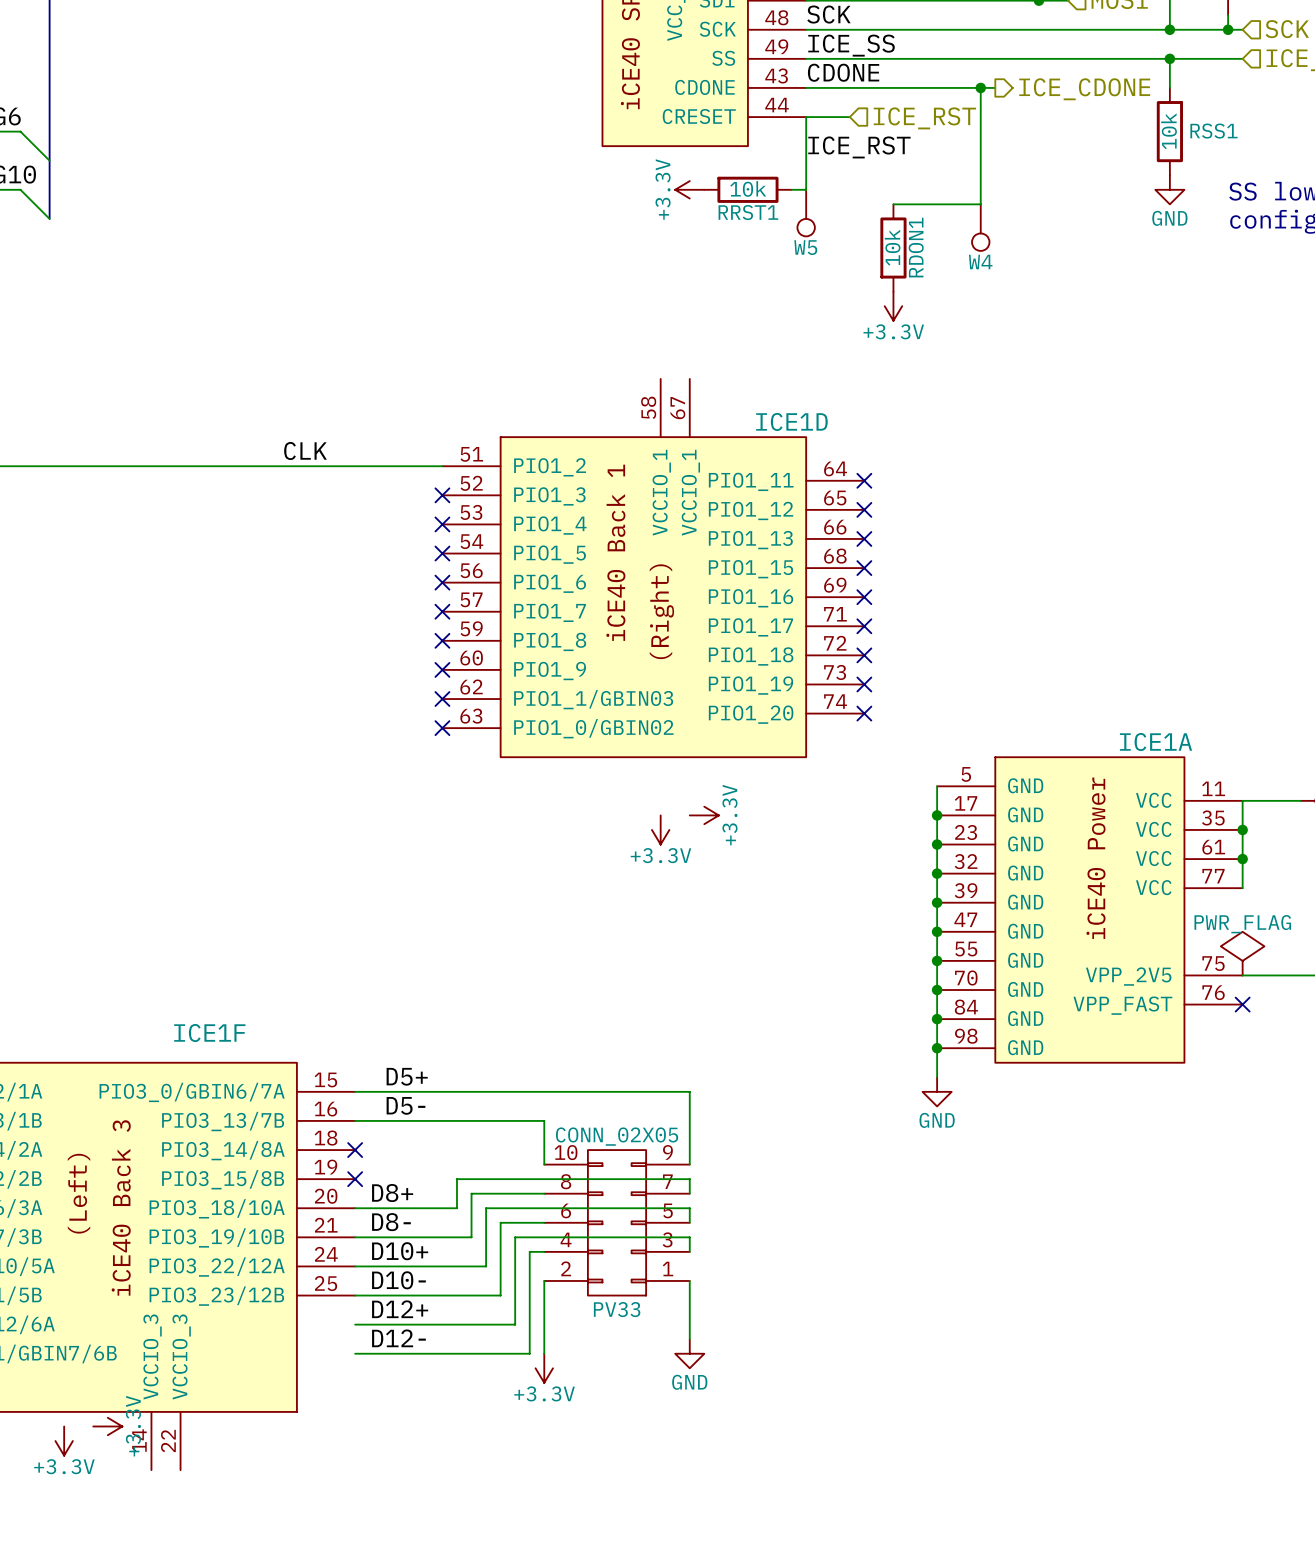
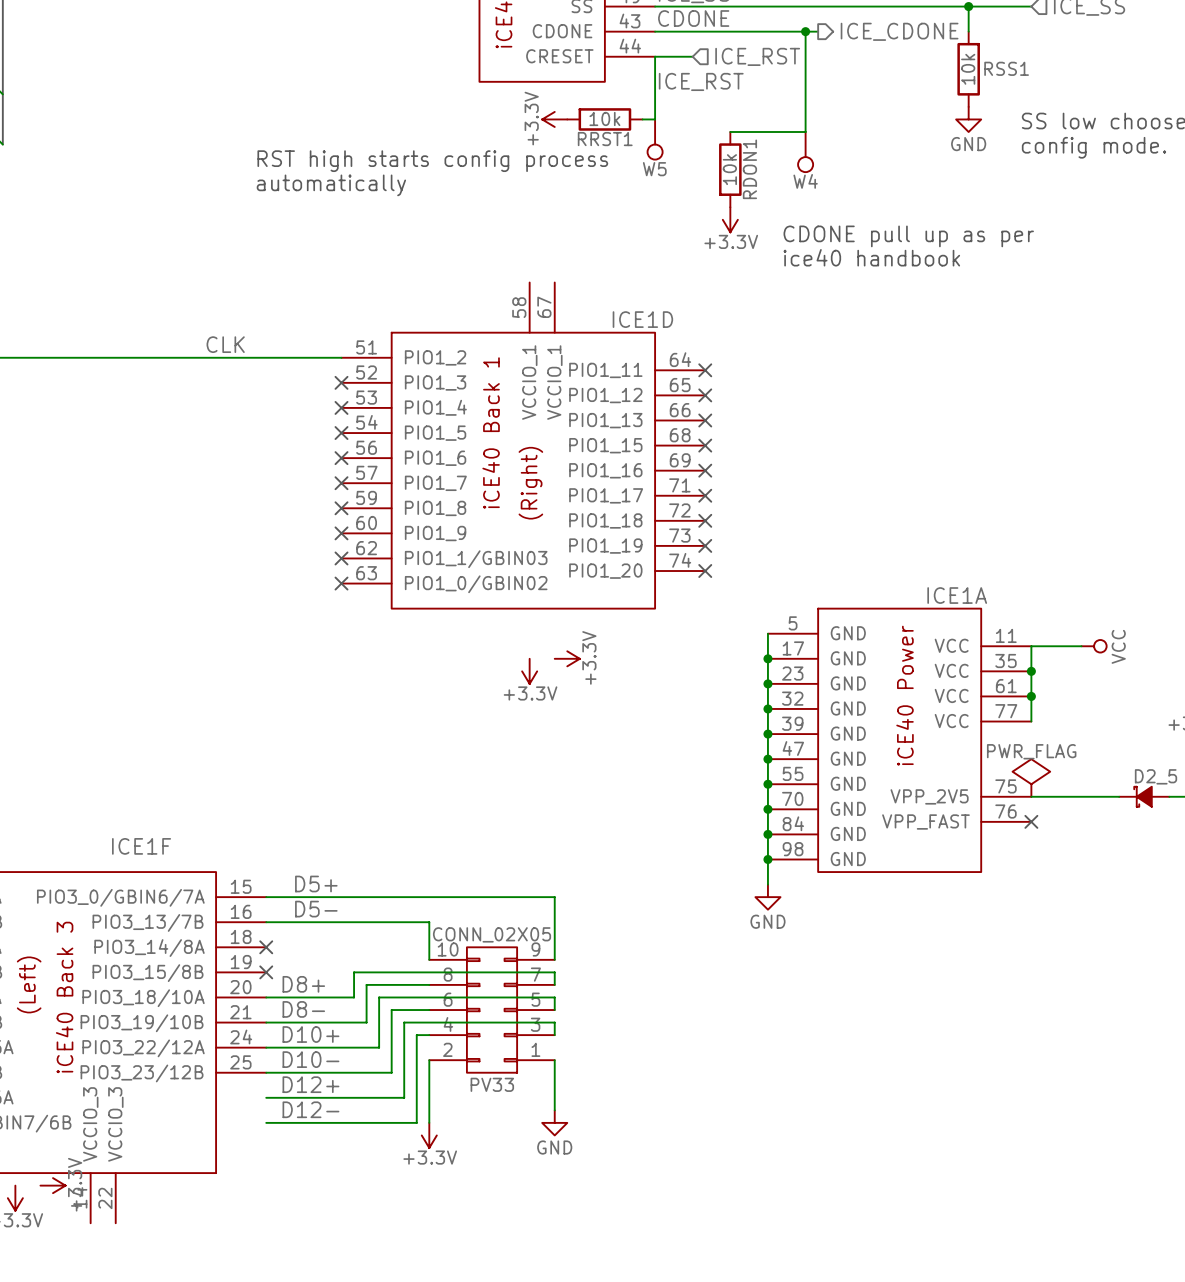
text: none -> RST high starts config process (432, 161)
text: none -> automatically (331, 185)
text: none -> CDONE pull up as per (908, 236)
text: none -> ice40 handbook (871, 257)

